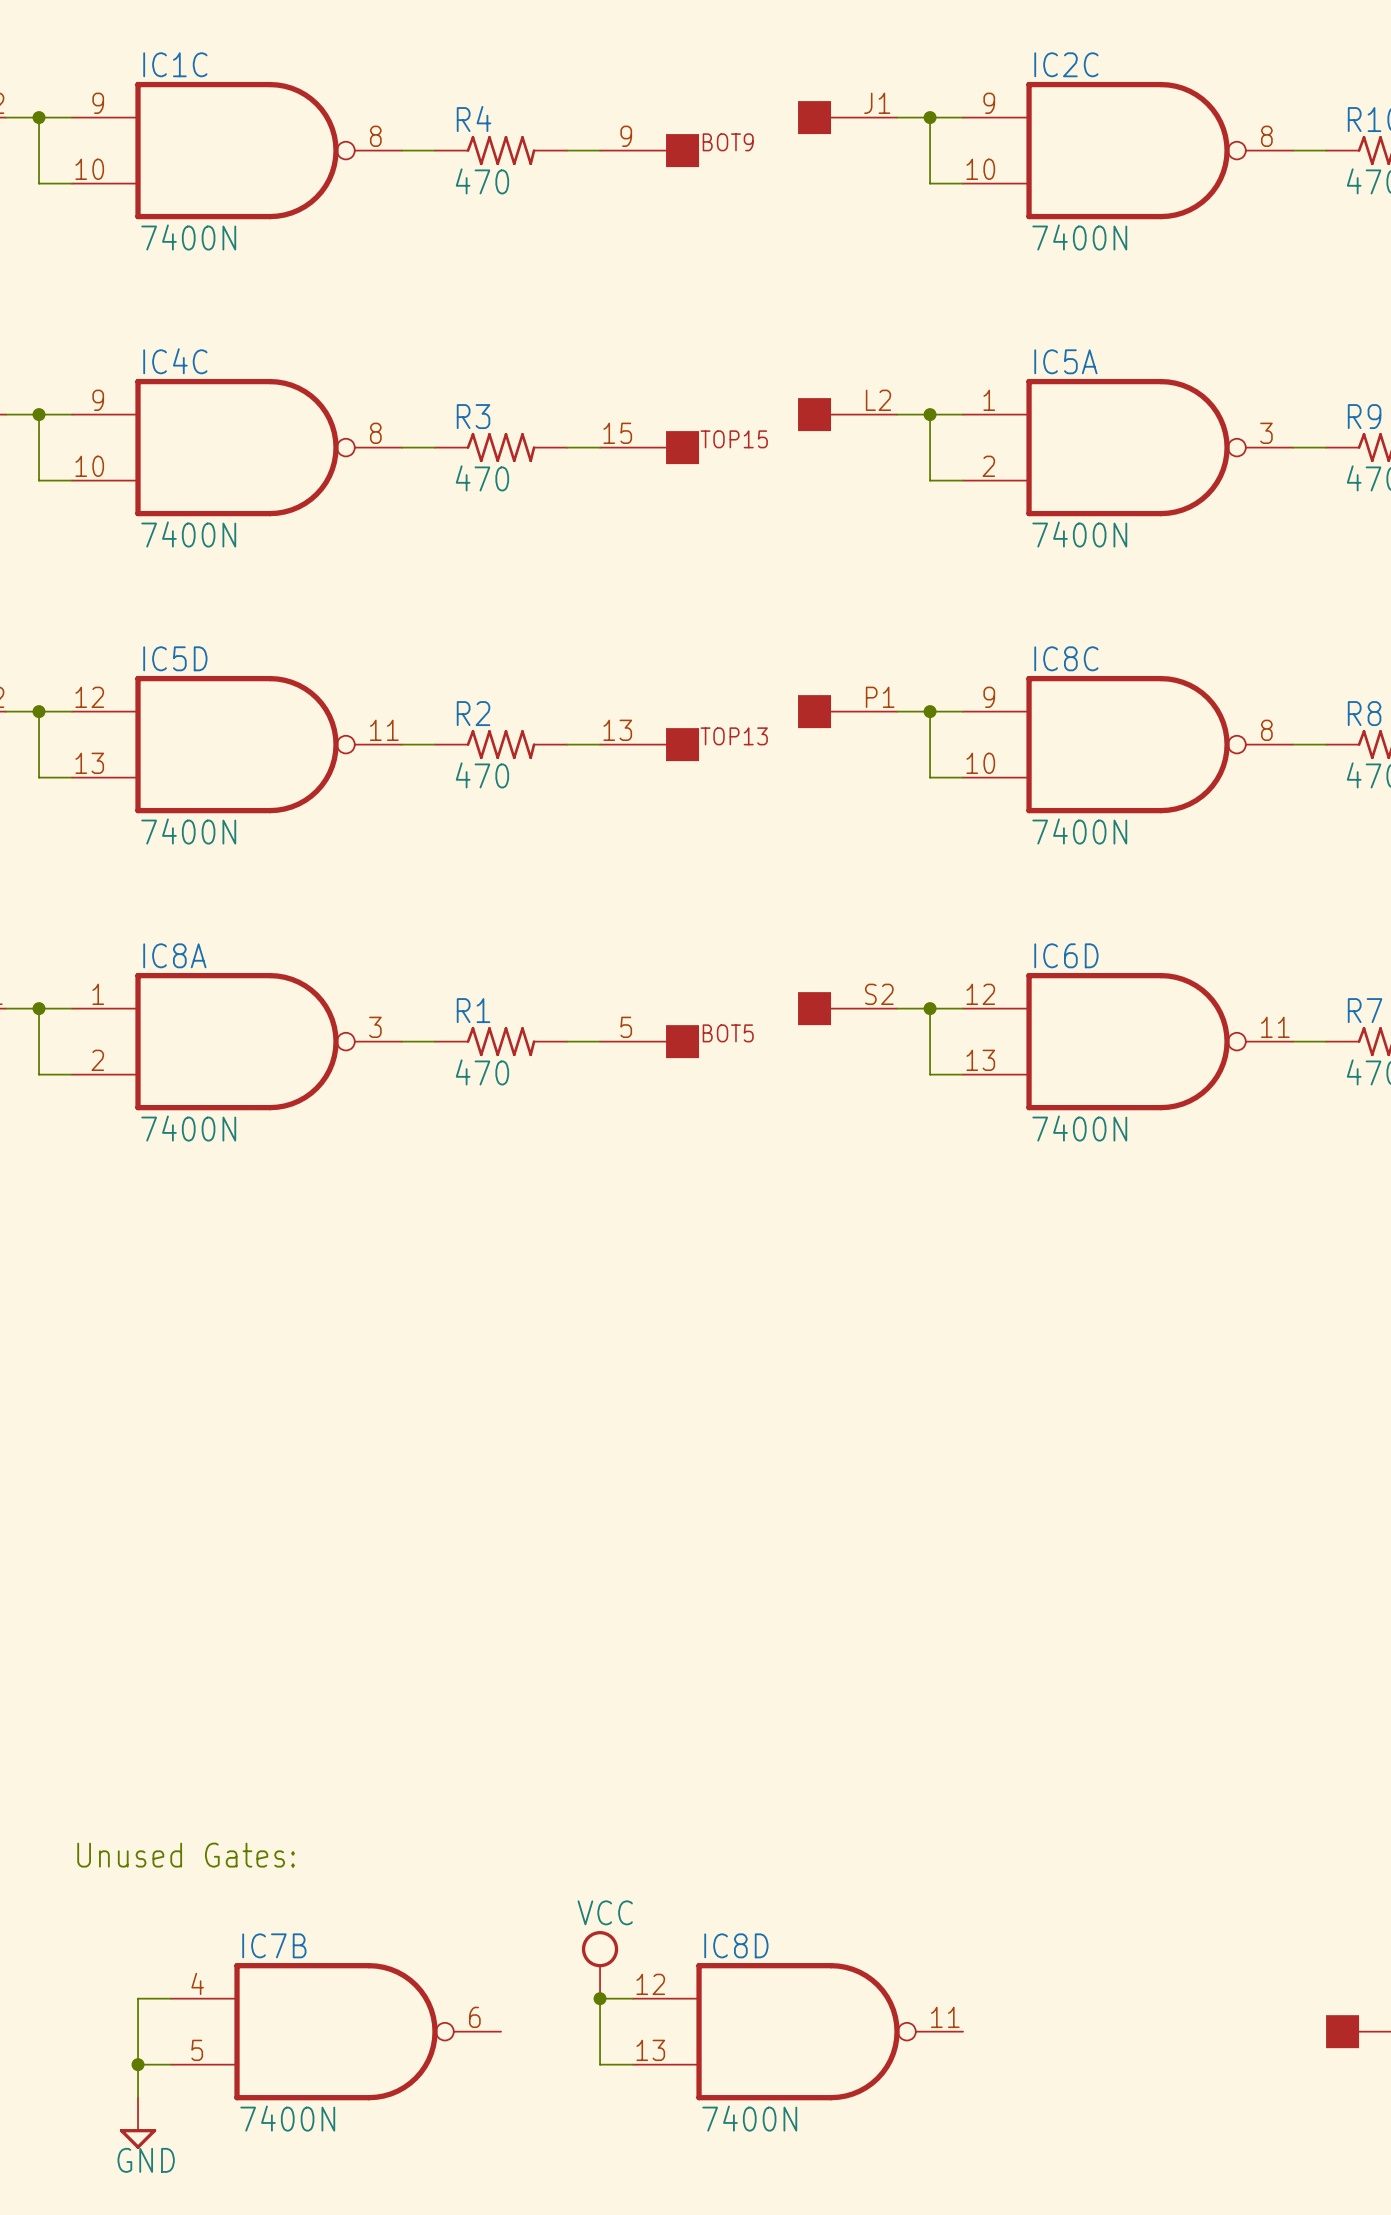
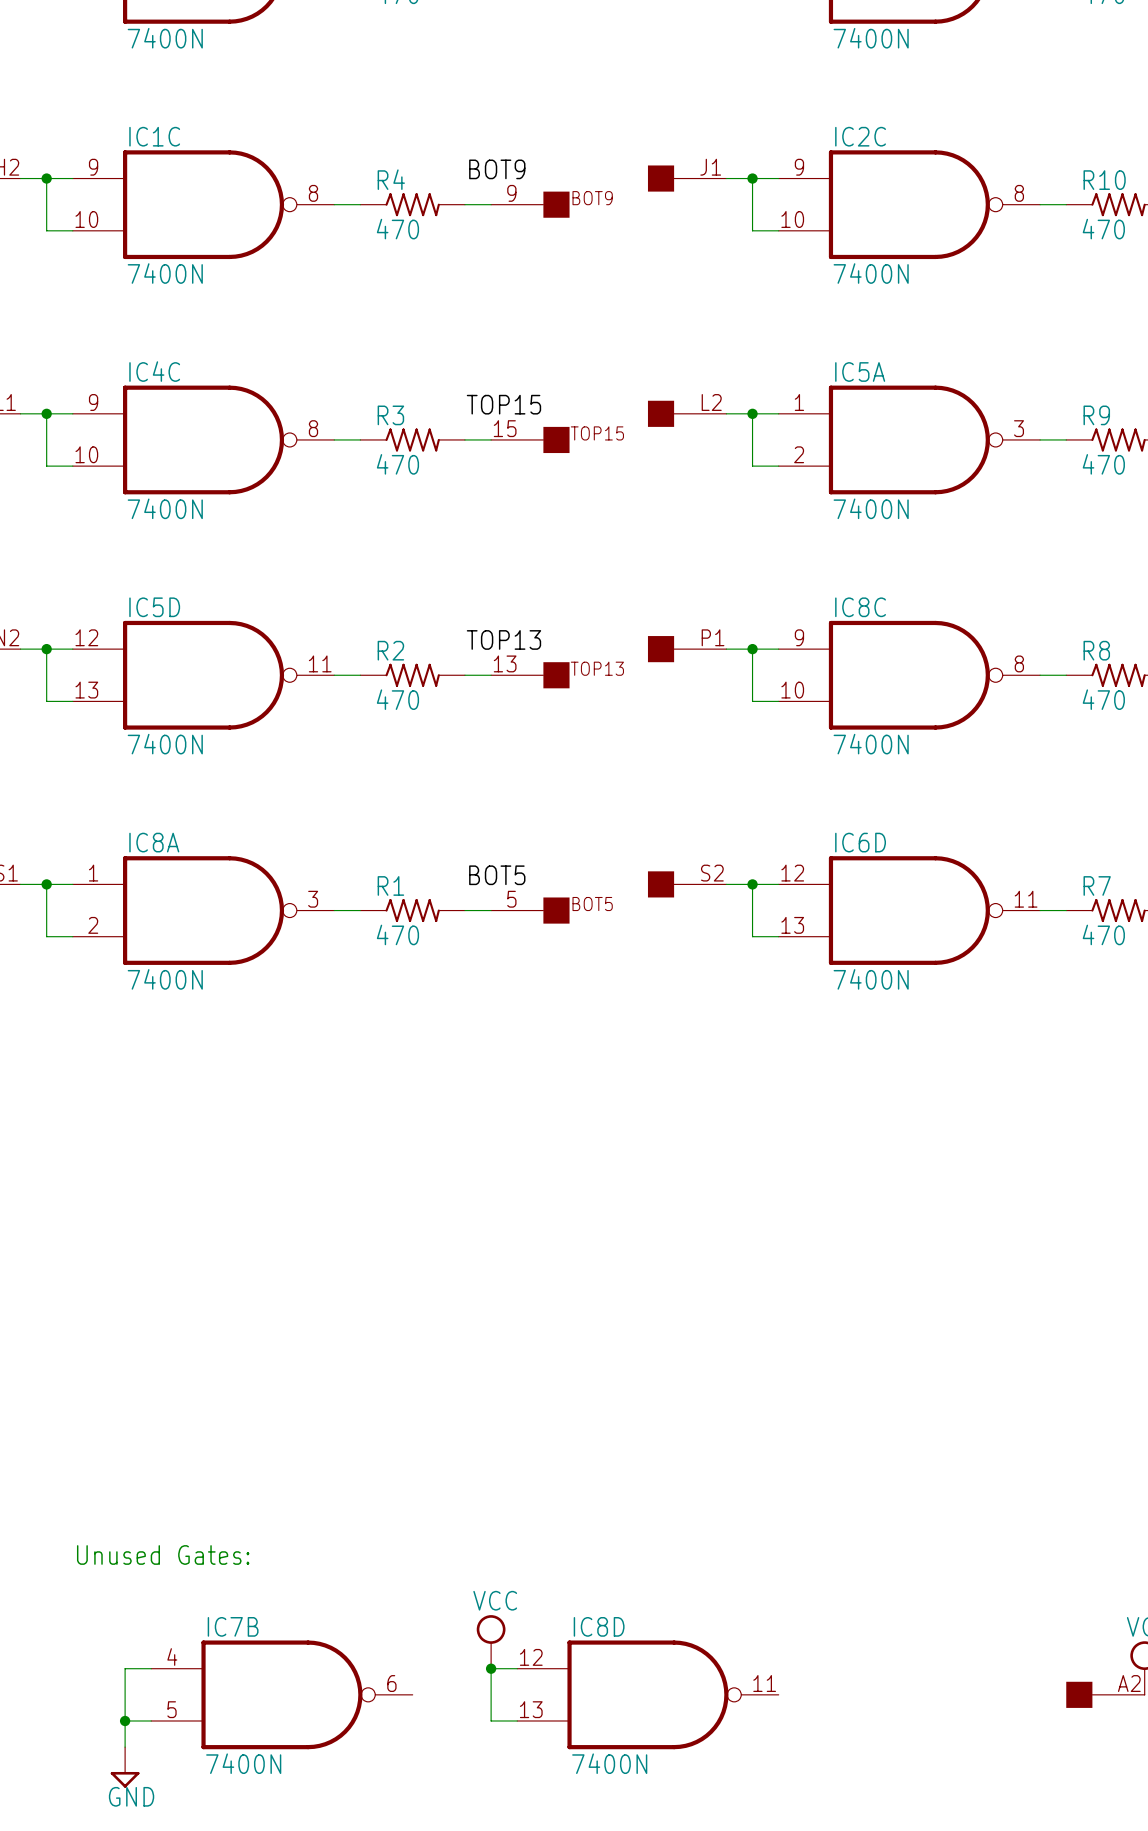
label: none -> BOT9 (497, 169)
label: none -> TOP15 (503, 404)
label: none -> TOP13 (503, 639)
label: none -> BOT5 (497, 875)

